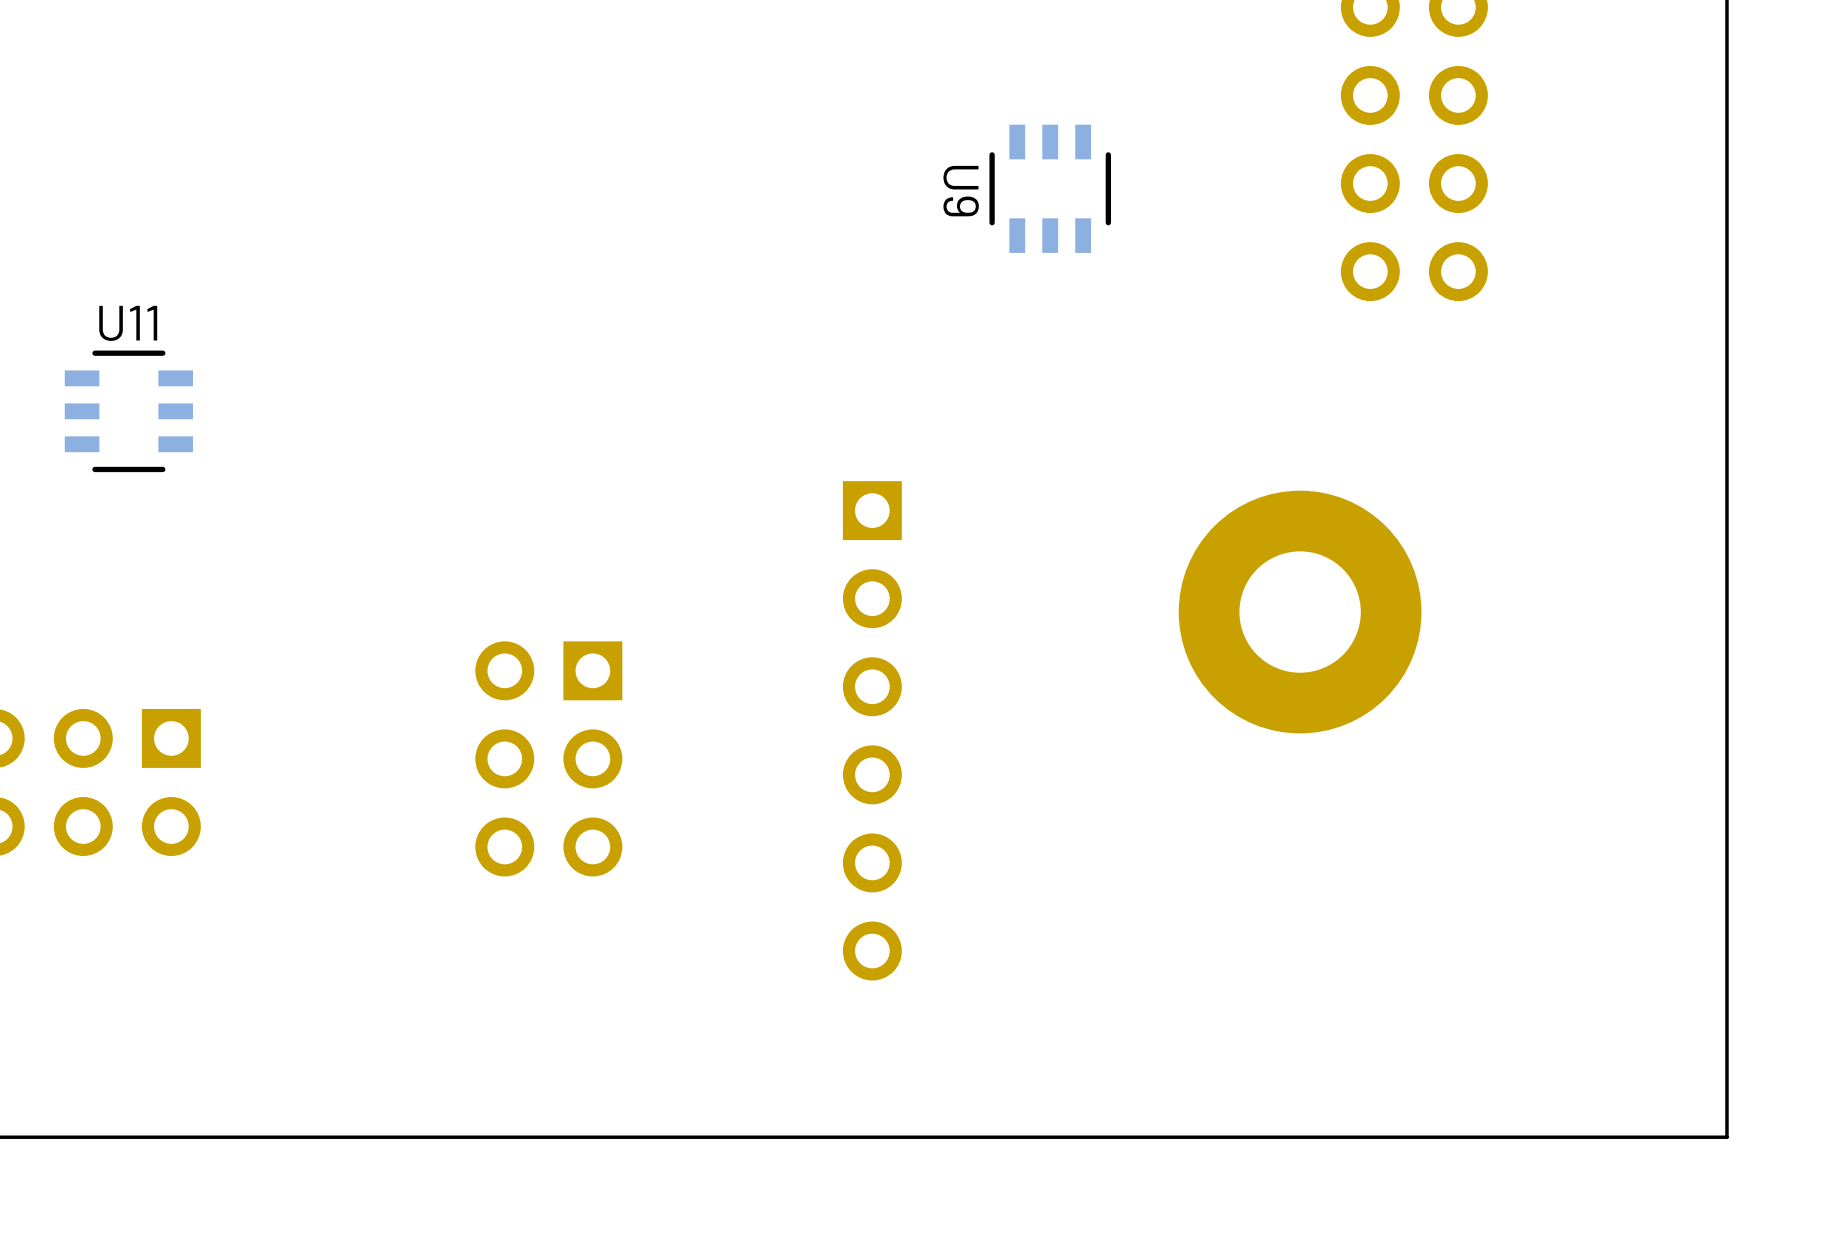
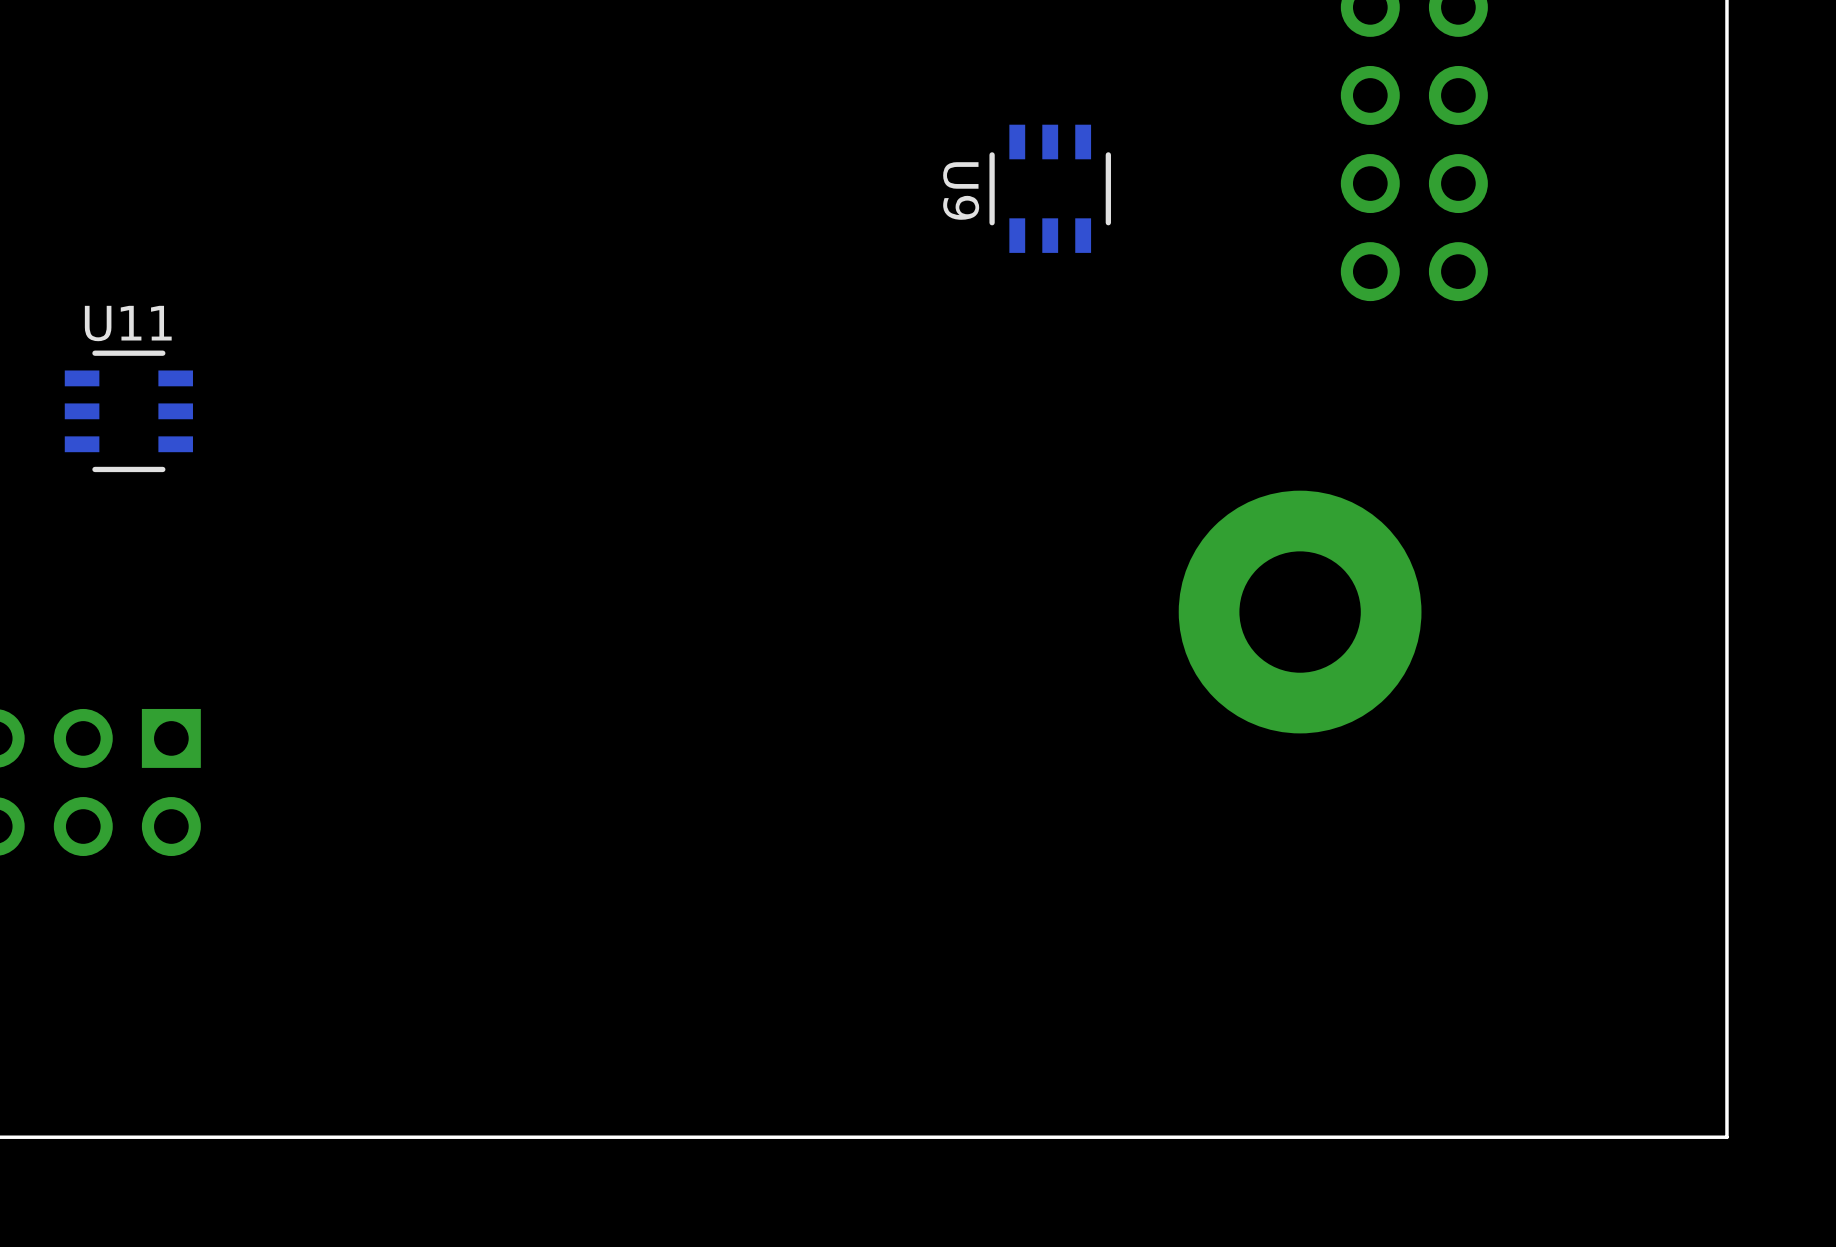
part: (872, 730) -> none
part: (548, 758) -> none

